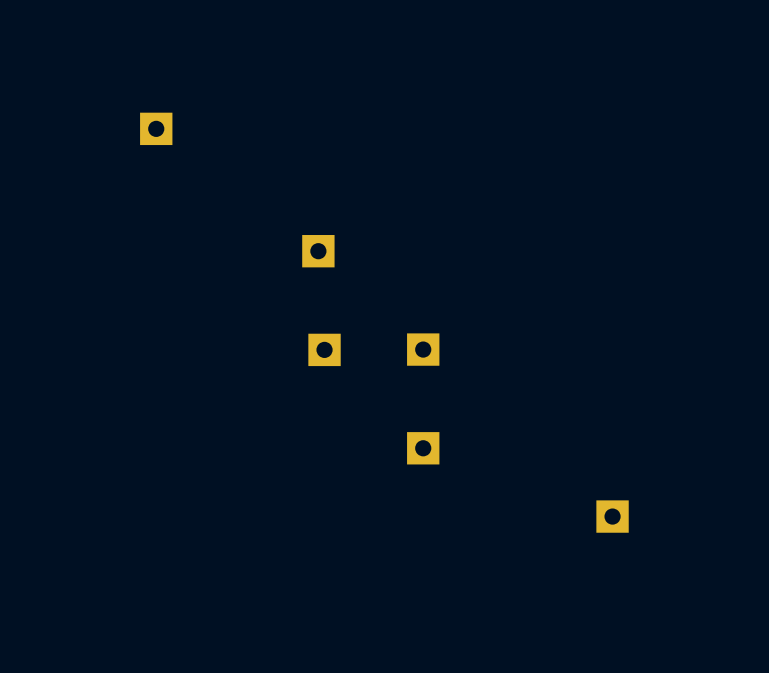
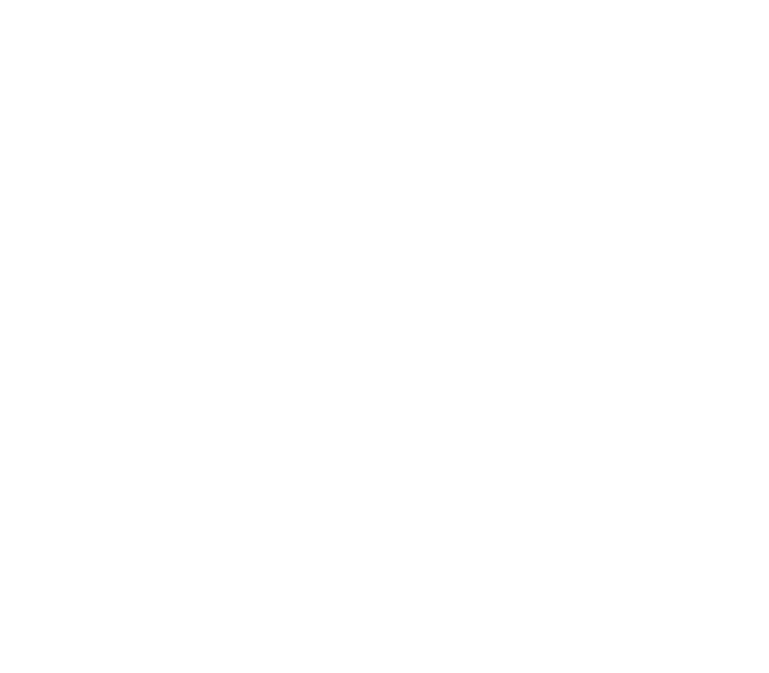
part: (156, 128) -> none
part: (318, 251) -> none
part: (324, 349) -> none
part: (423, 349) -> none
part: (423, 448) -> none
part: (612, 516) -> none

